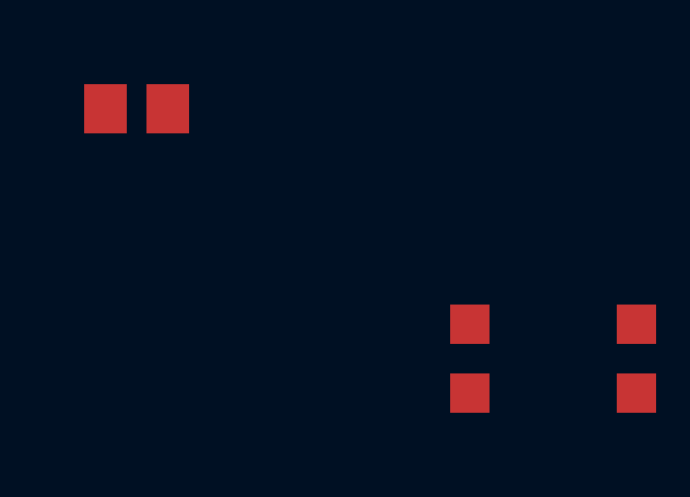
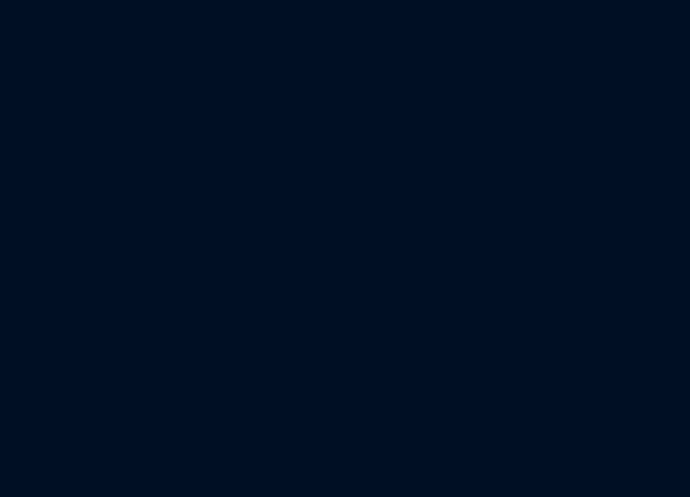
part: (136, 108) -> none
part: (469, 358) -> none
part: (636, 358) -> none

